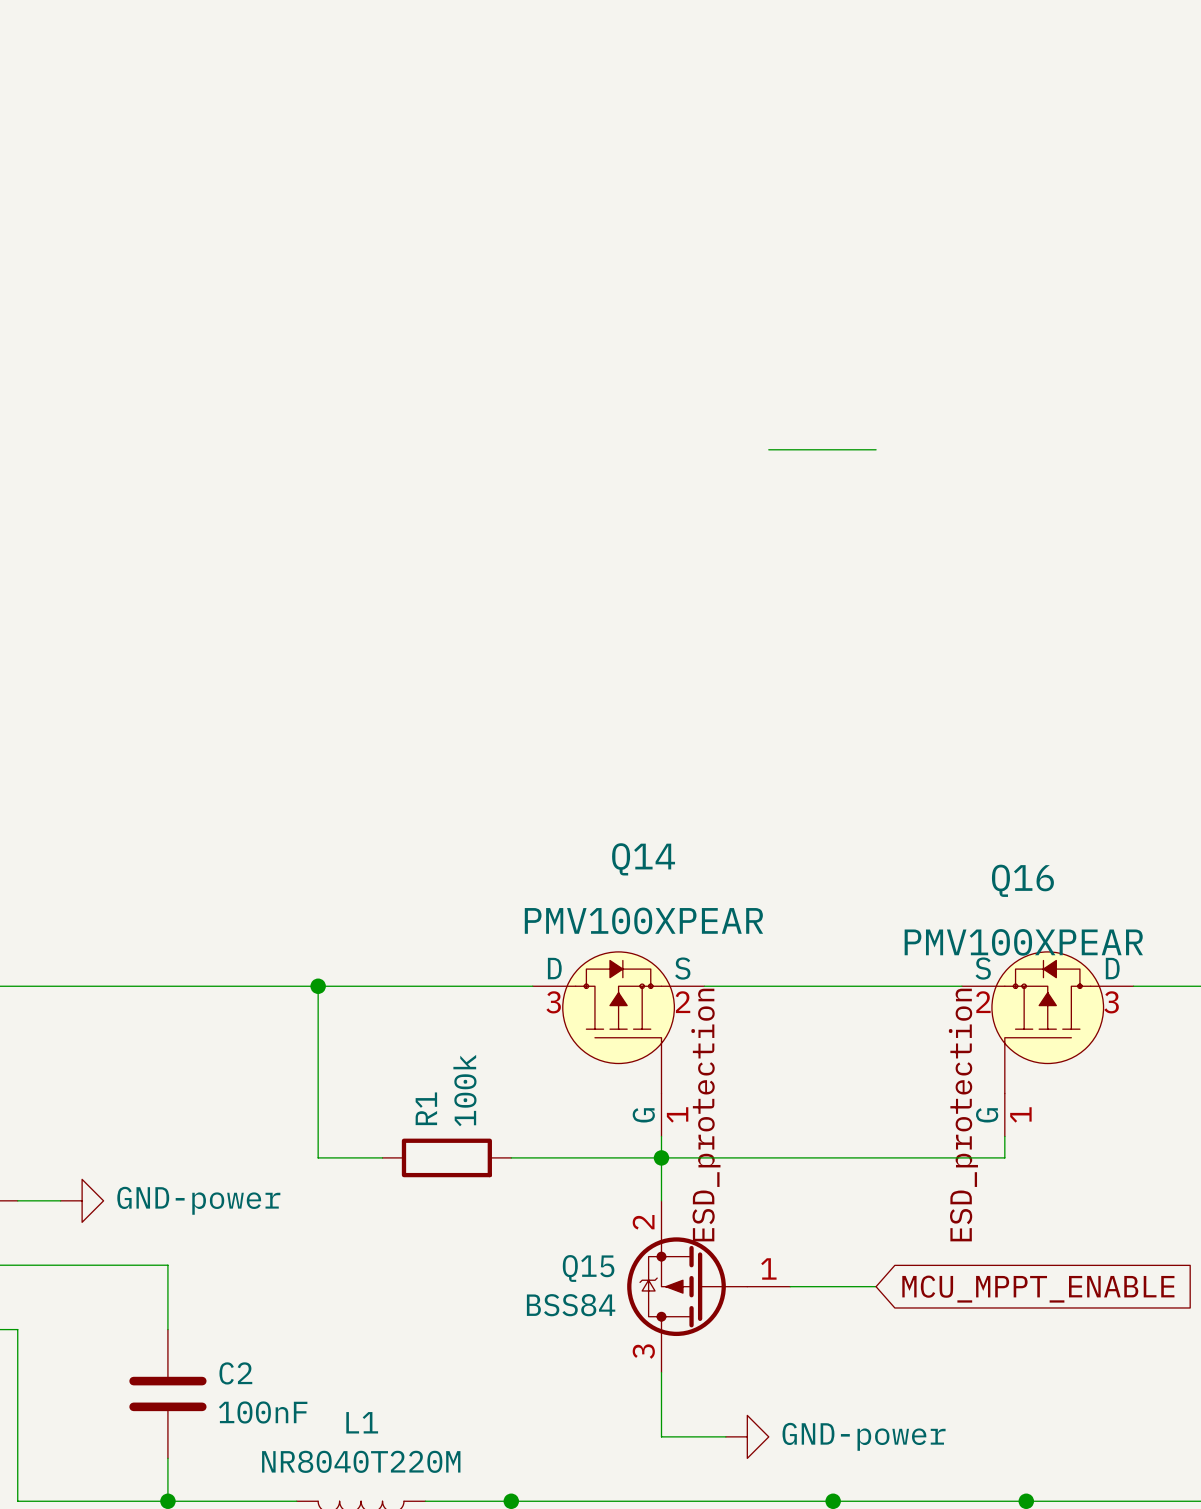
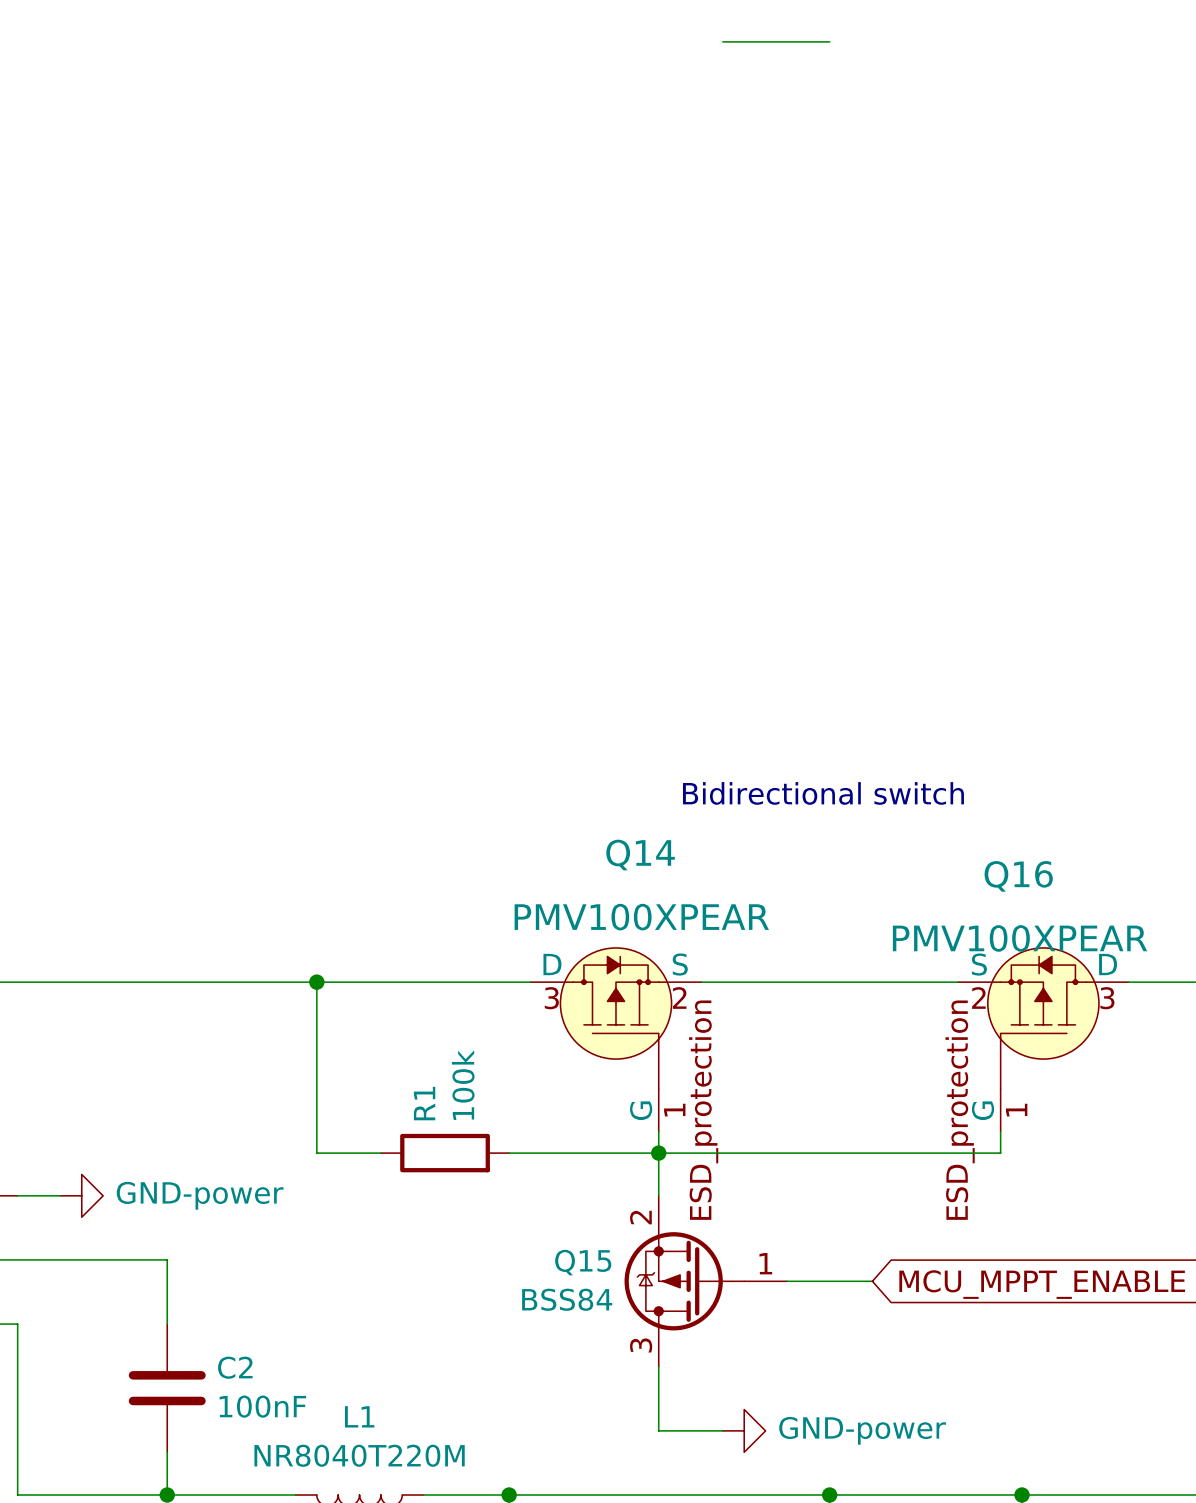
wire: (768, 449) (876, 449) -> (722, 41) (829, 41)
text: none -> Bidirectional switch (823, 793)

